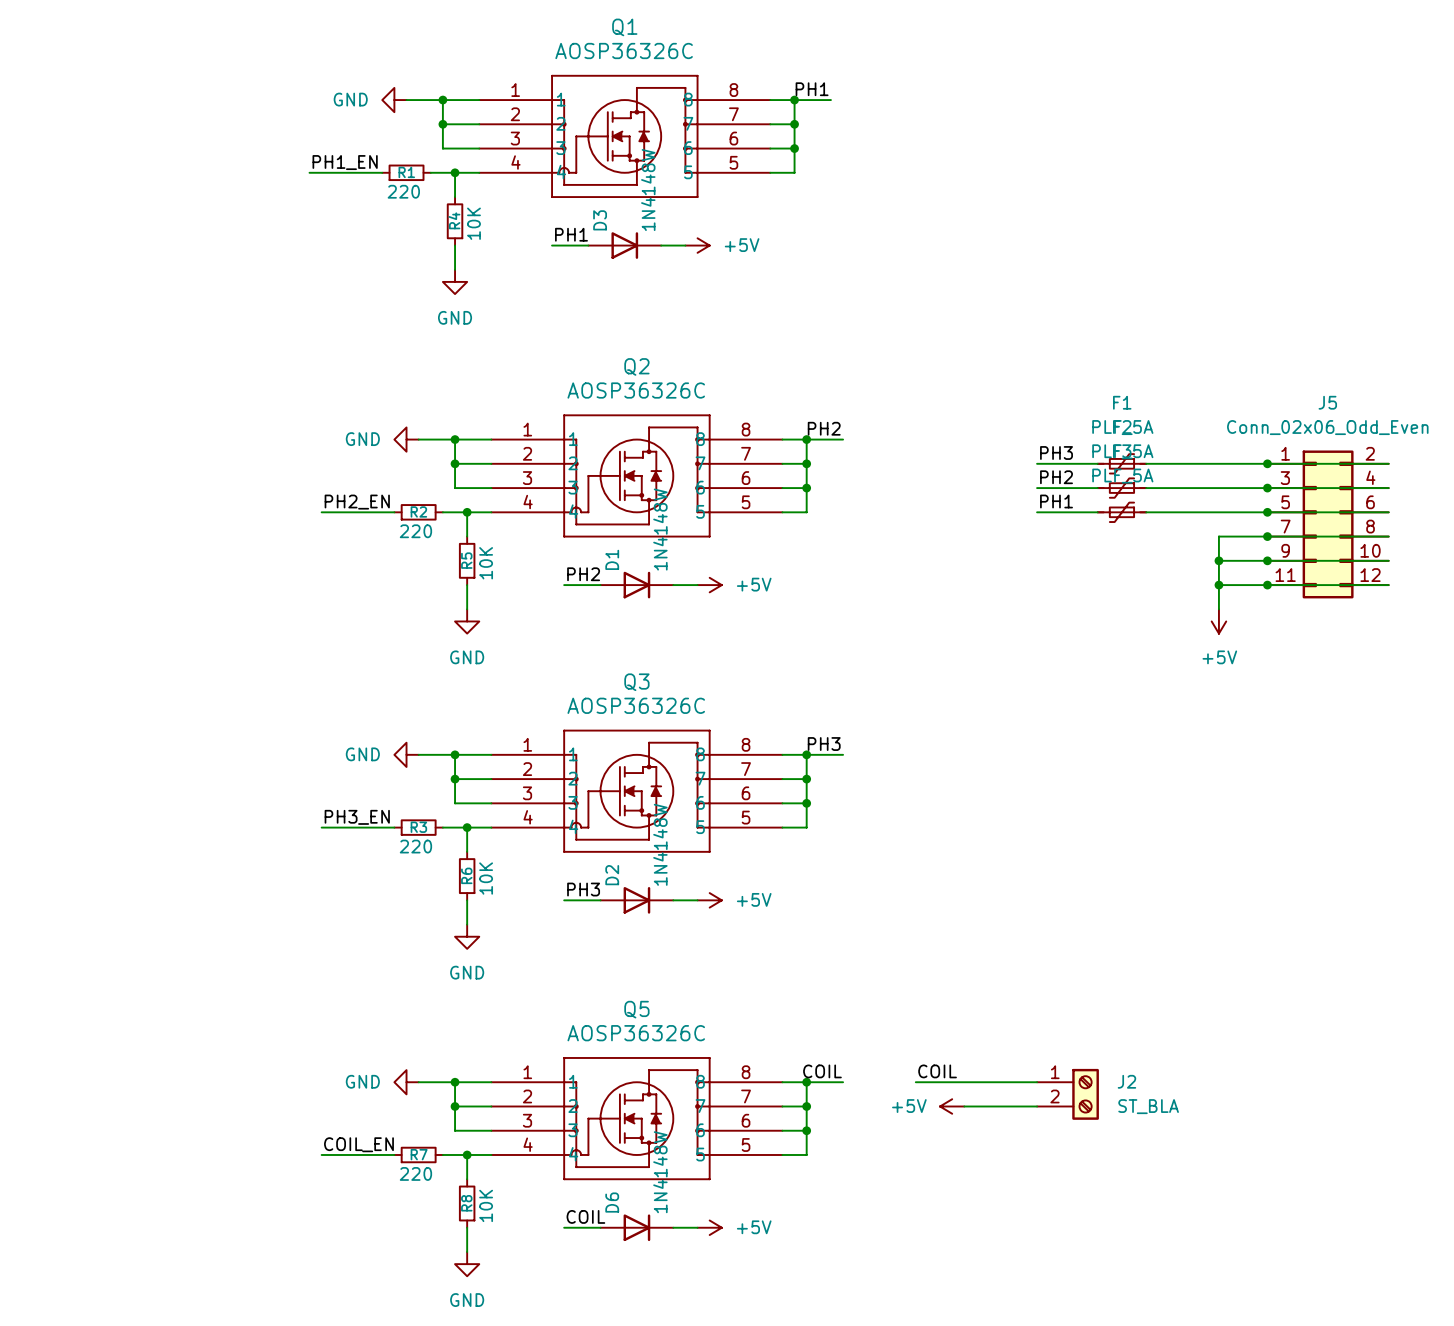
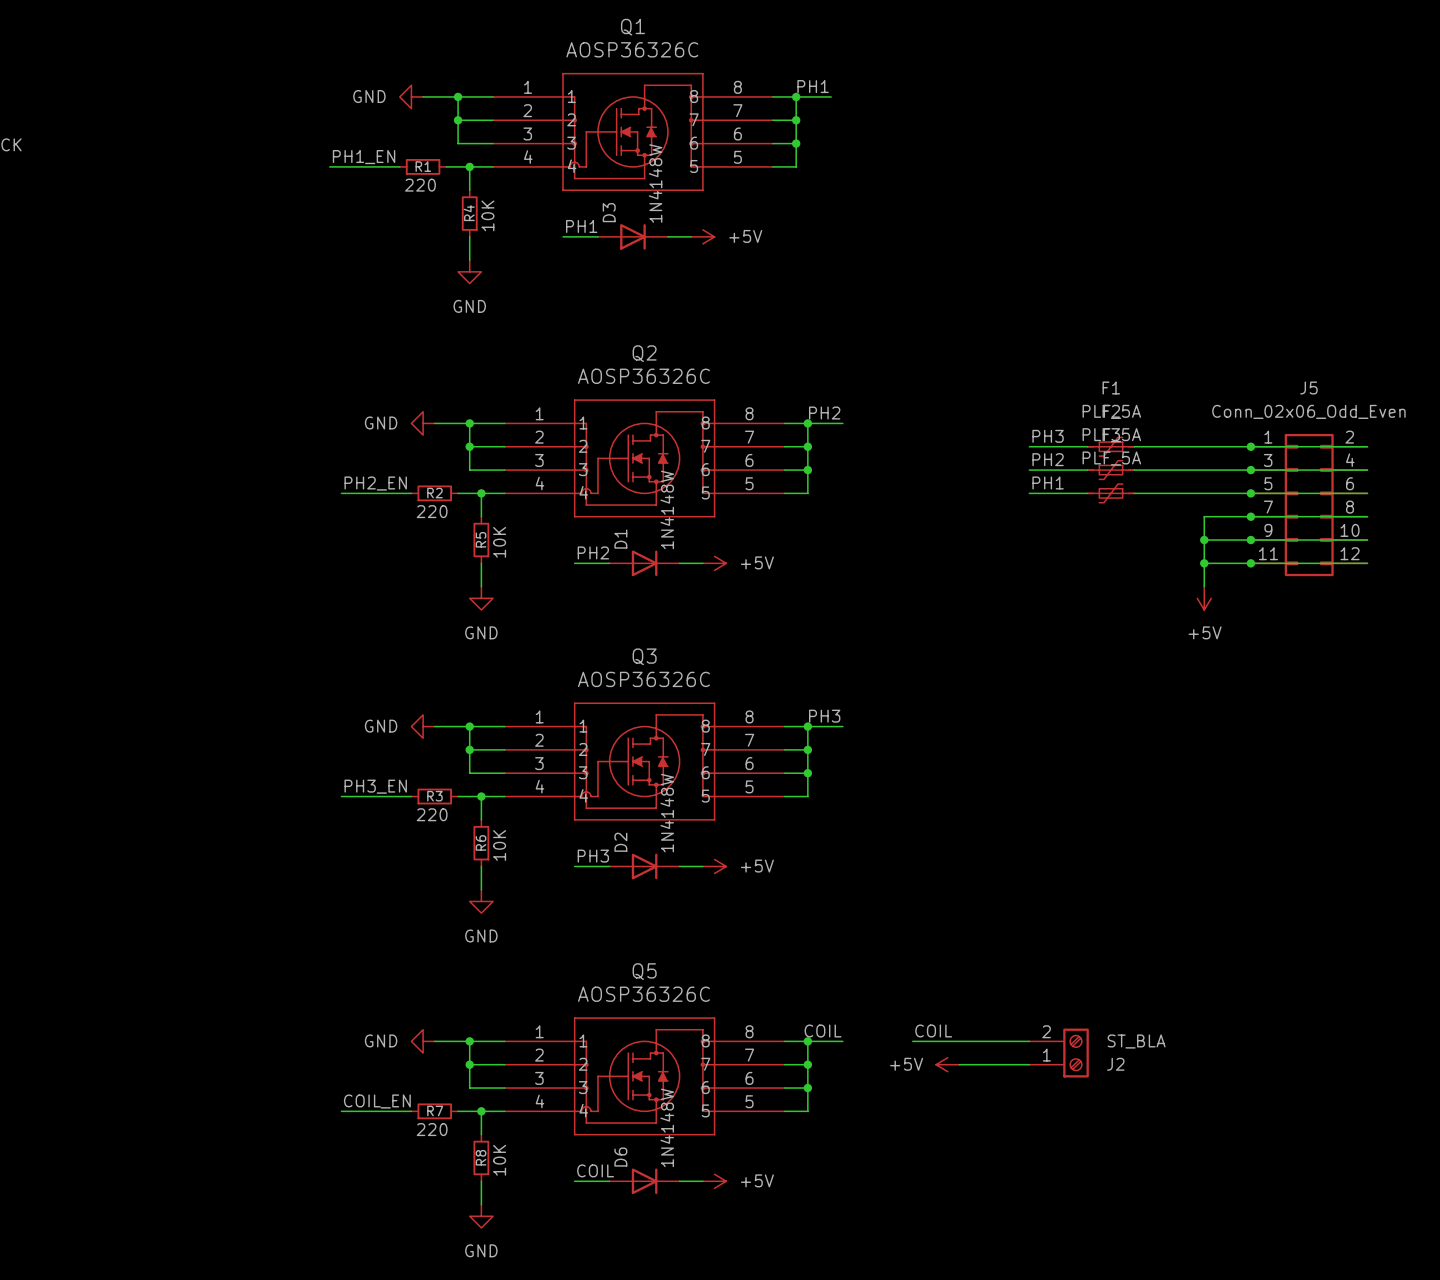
J2 flip: as is (1085, 1094) -> up-down (1076, 1053)

